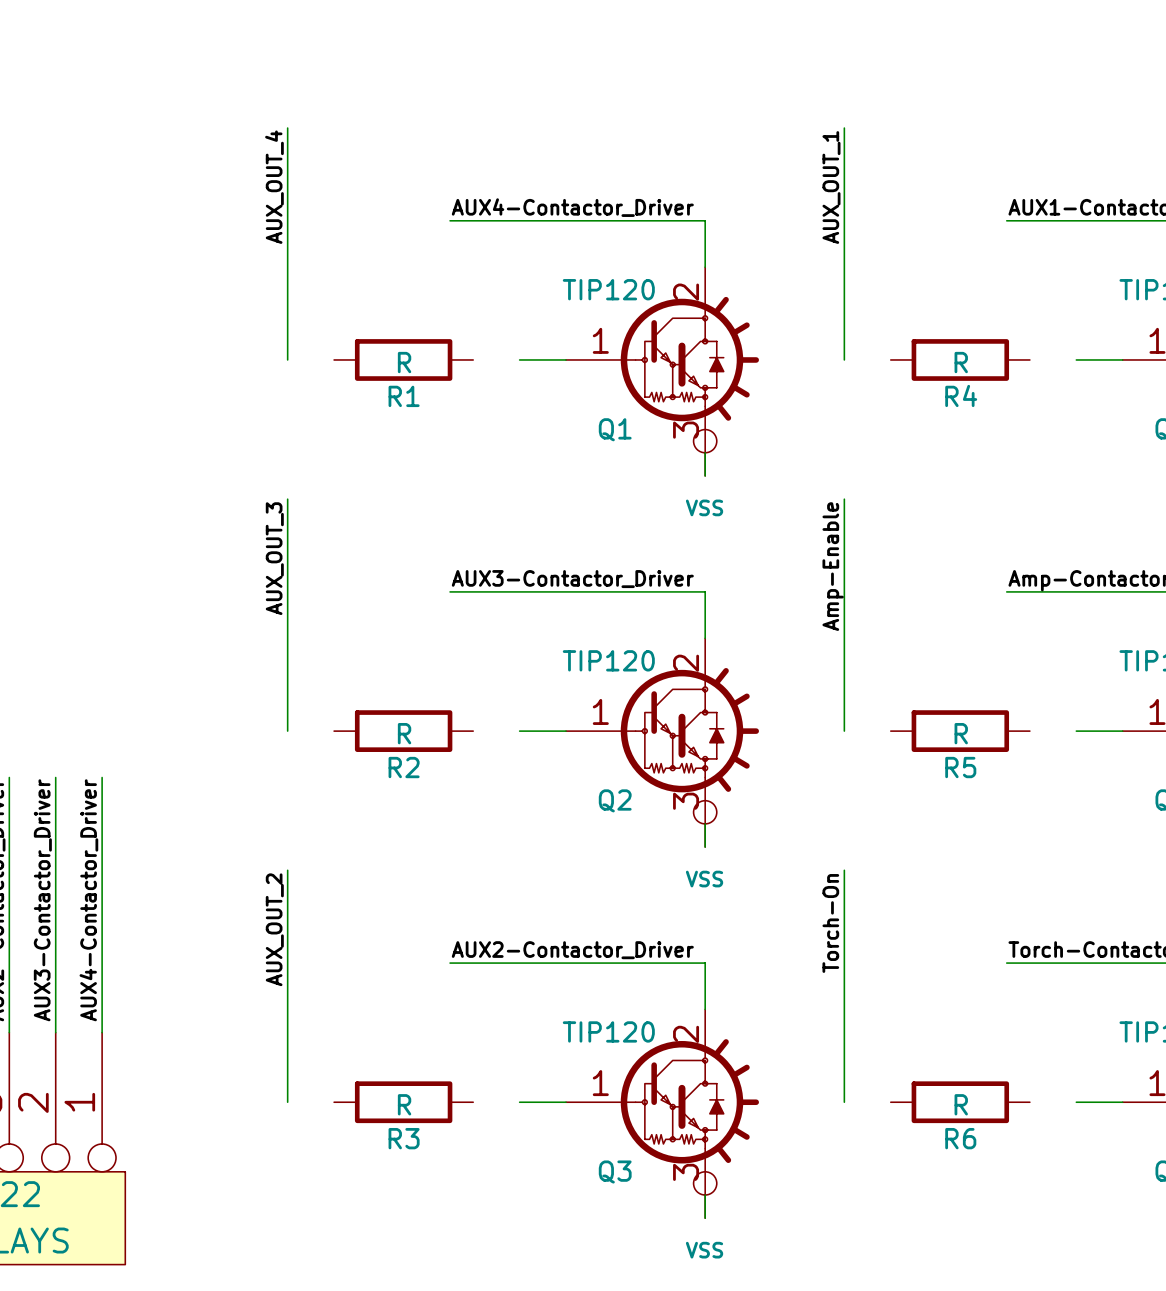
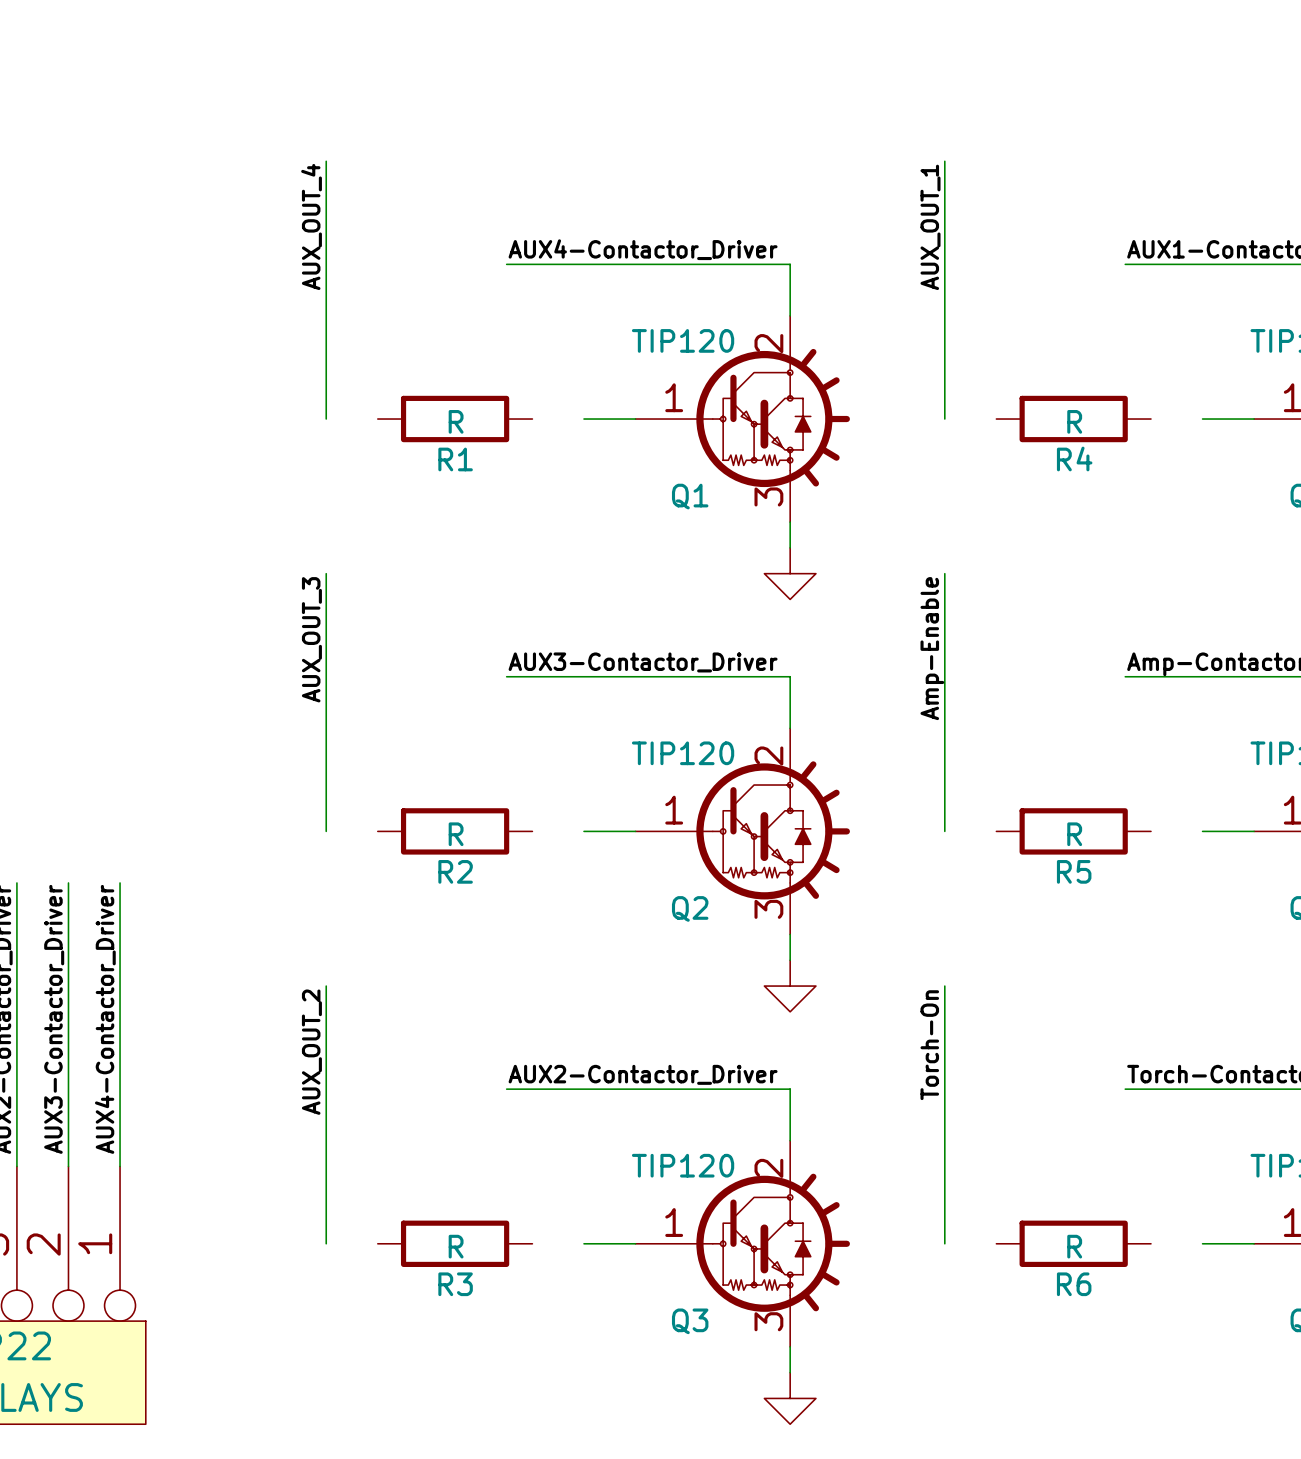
power symbol: VSS (705, 452) -> none
power symbol: none -> (790, 573)
power symbol: VSS (705, 823) -> none
power symbol: none -> (790, 986)
power symbol: VSS (705, 1195) -> none
power symbol: none -> (790, 1398)

